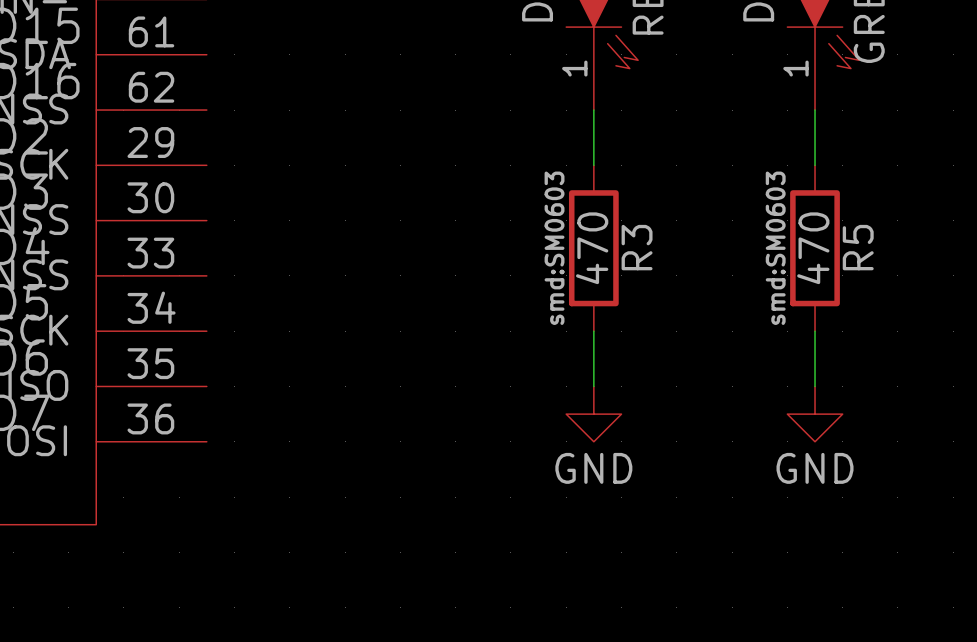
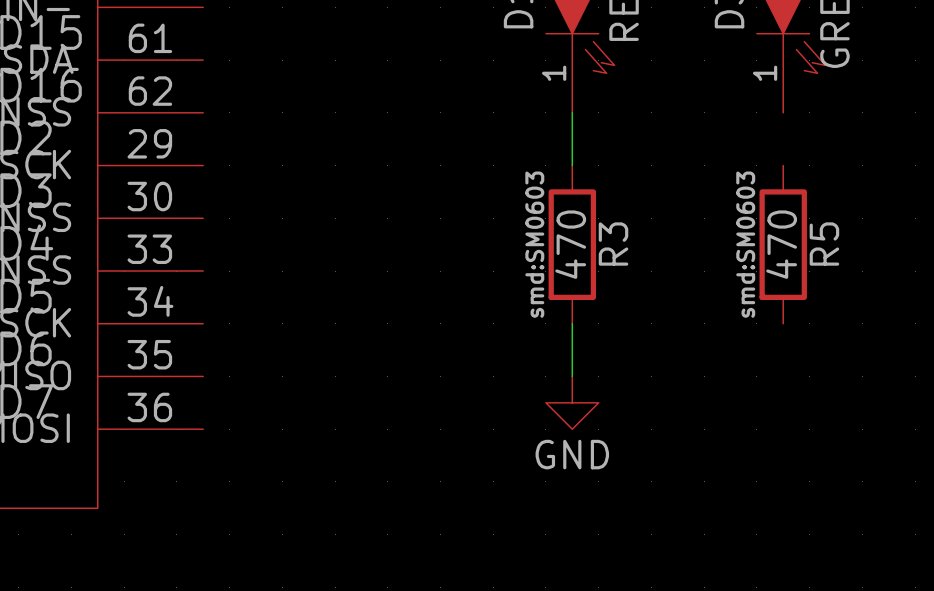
wire: (815, 110) (815, 165) -> none
wire: (815, 331) (815, 386) -> none
power symbol: GND (815, 414) -> none

